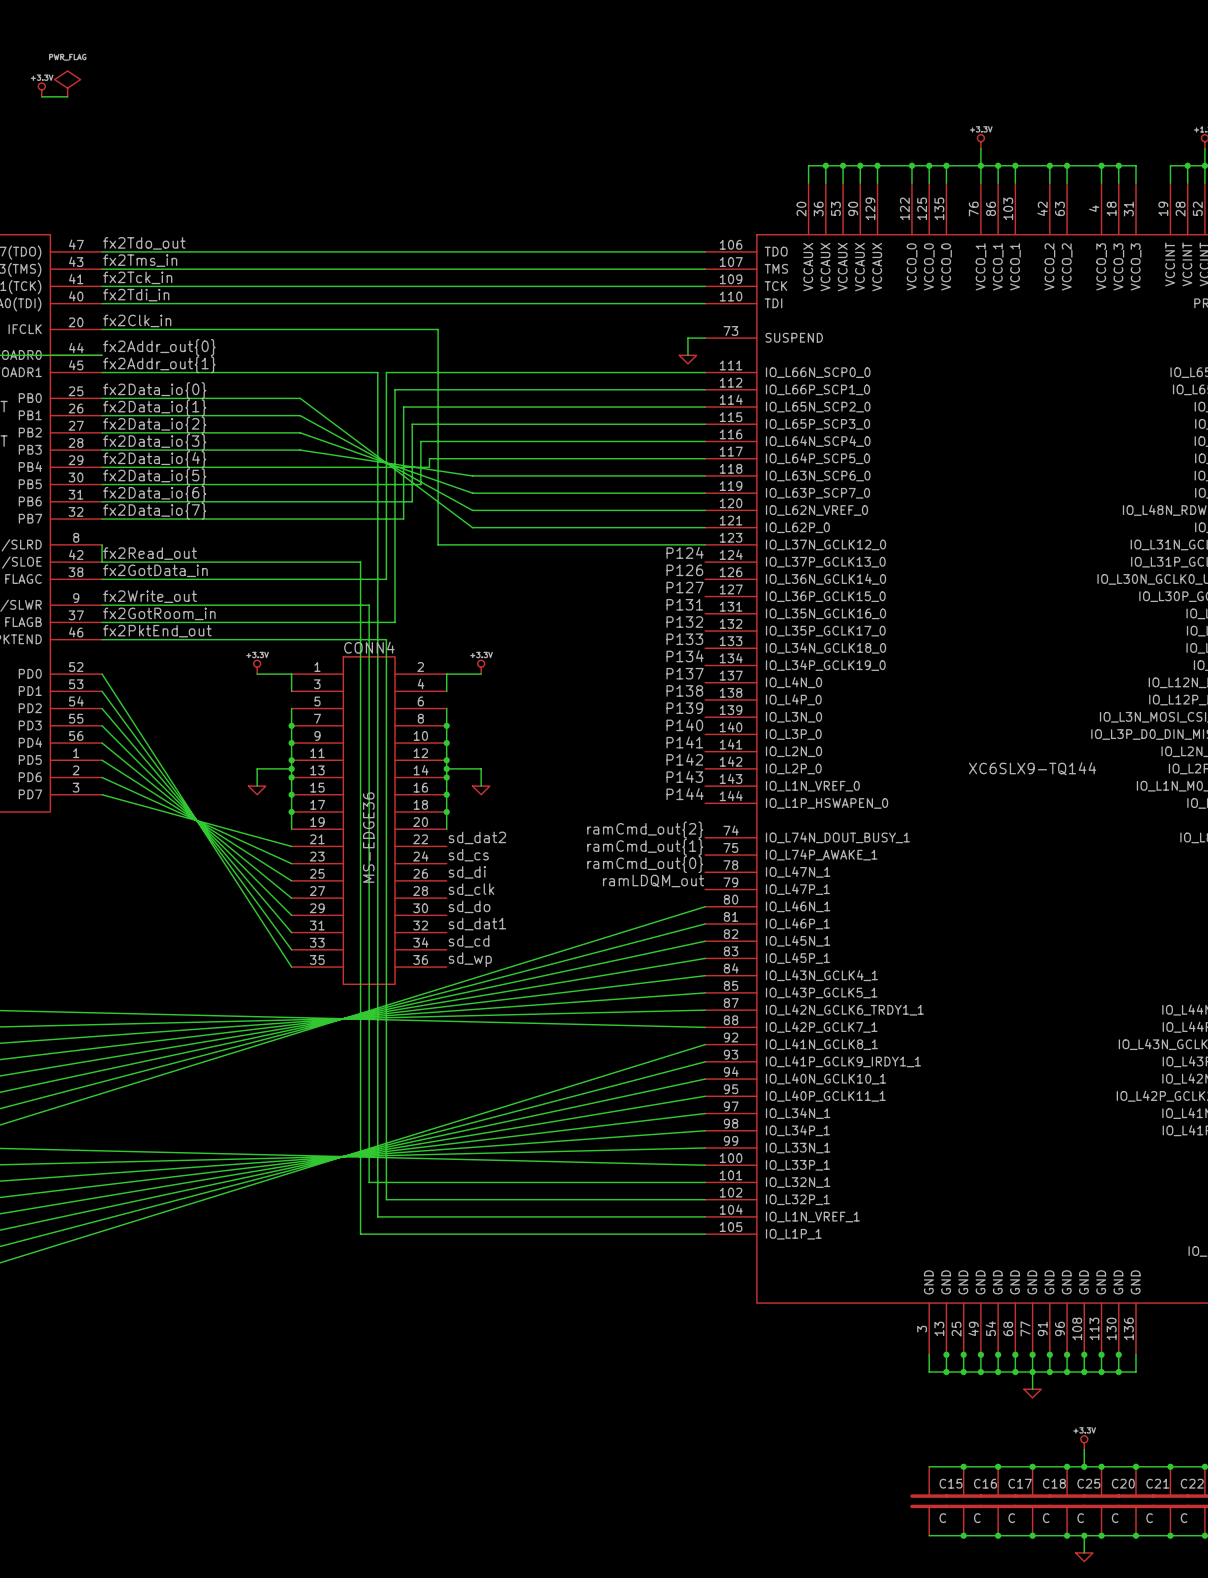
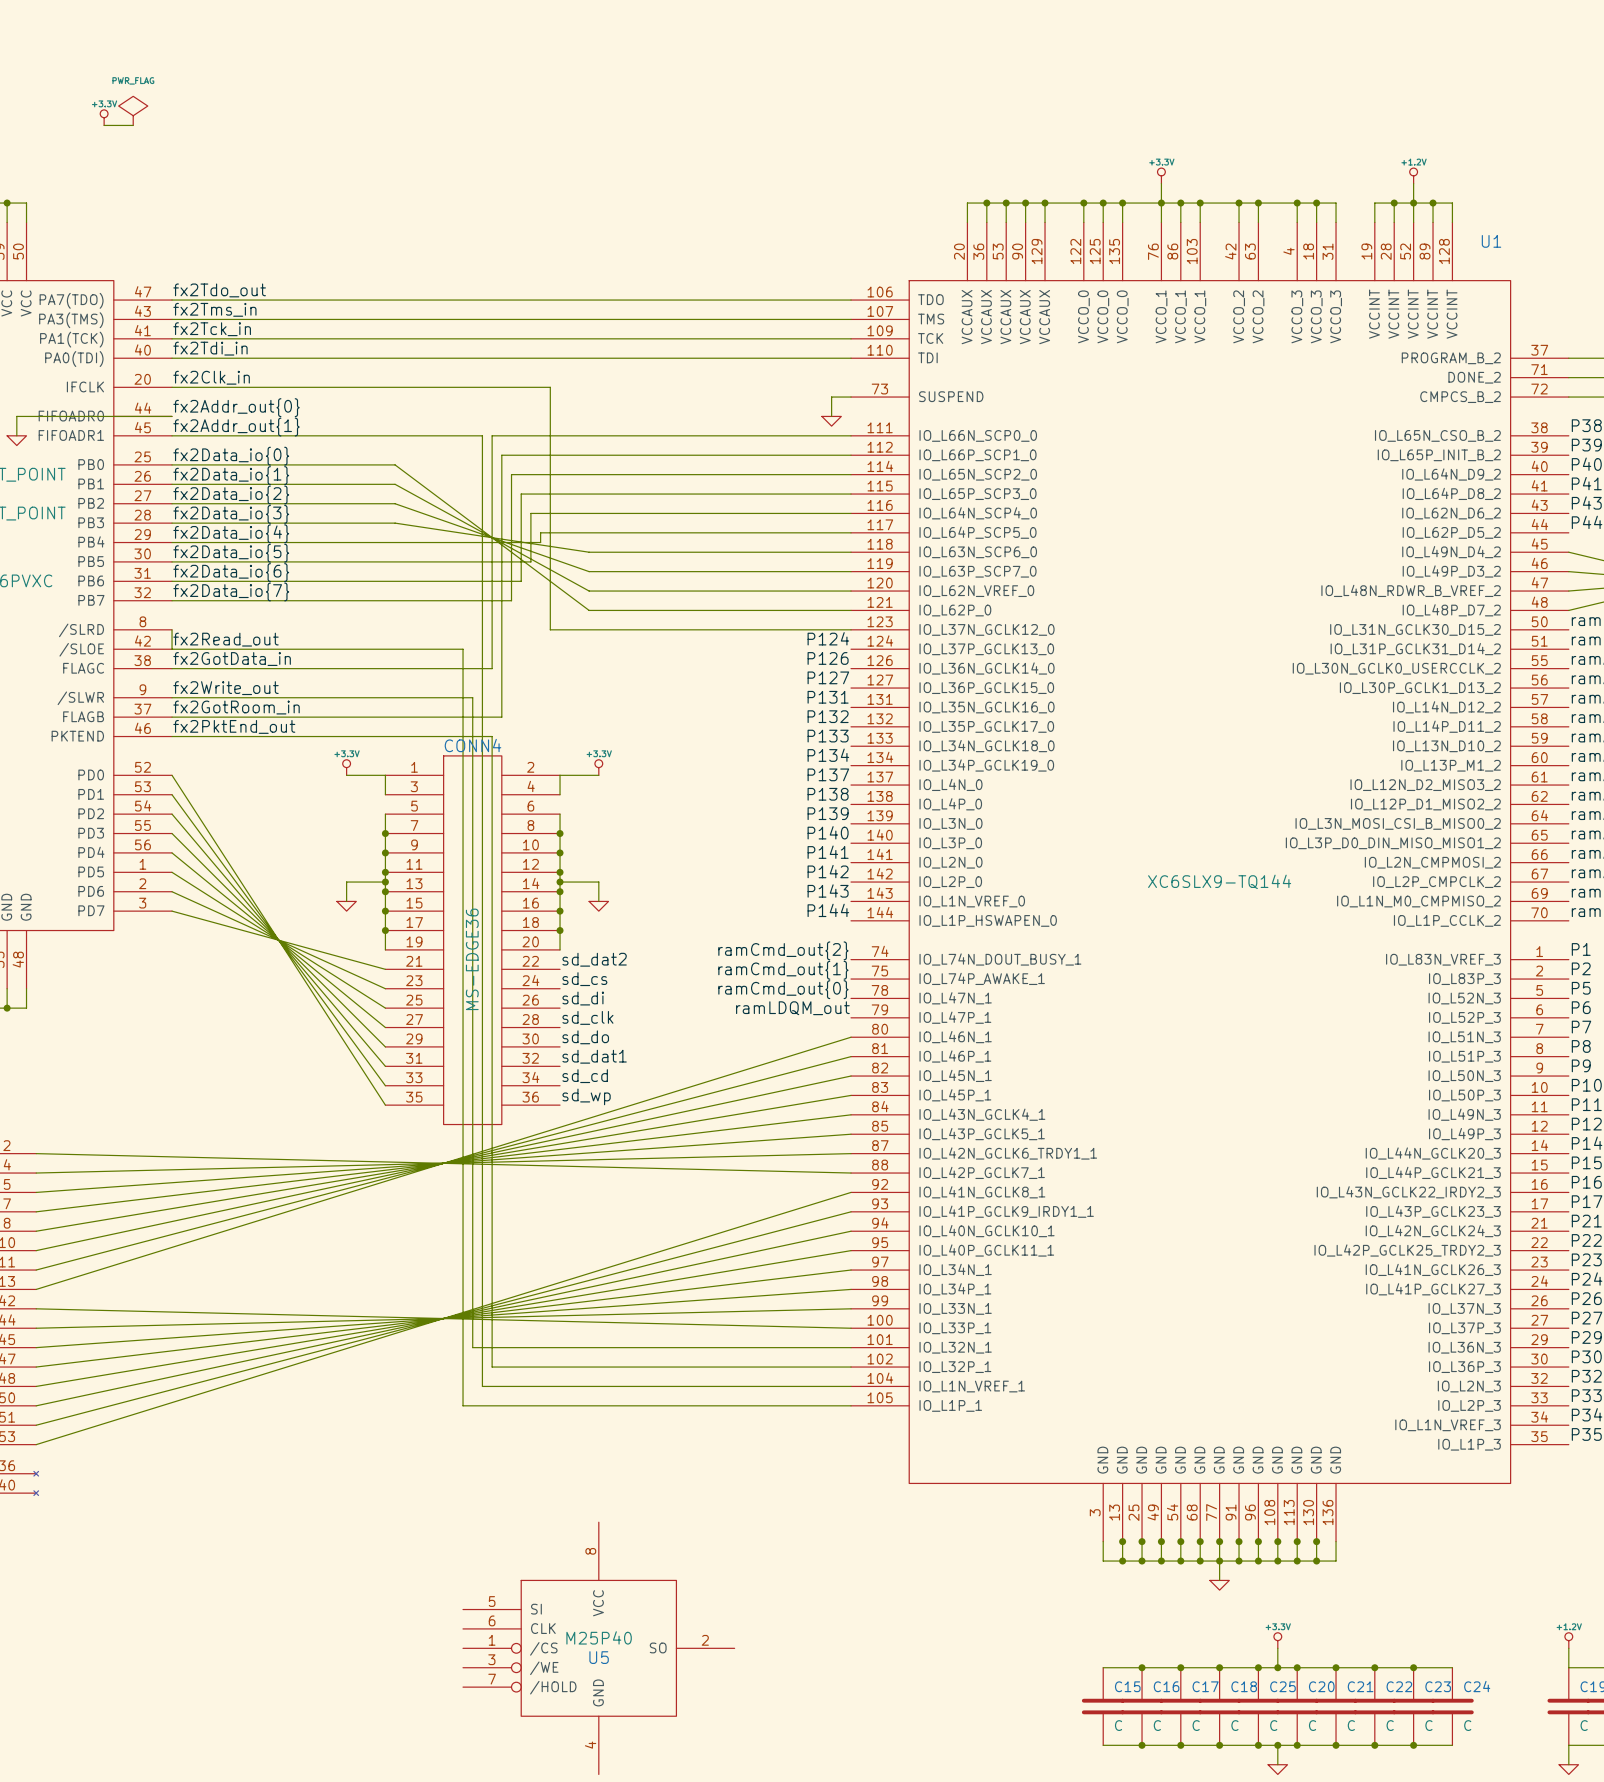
U5: none -> M25P40 (598, 1648)

